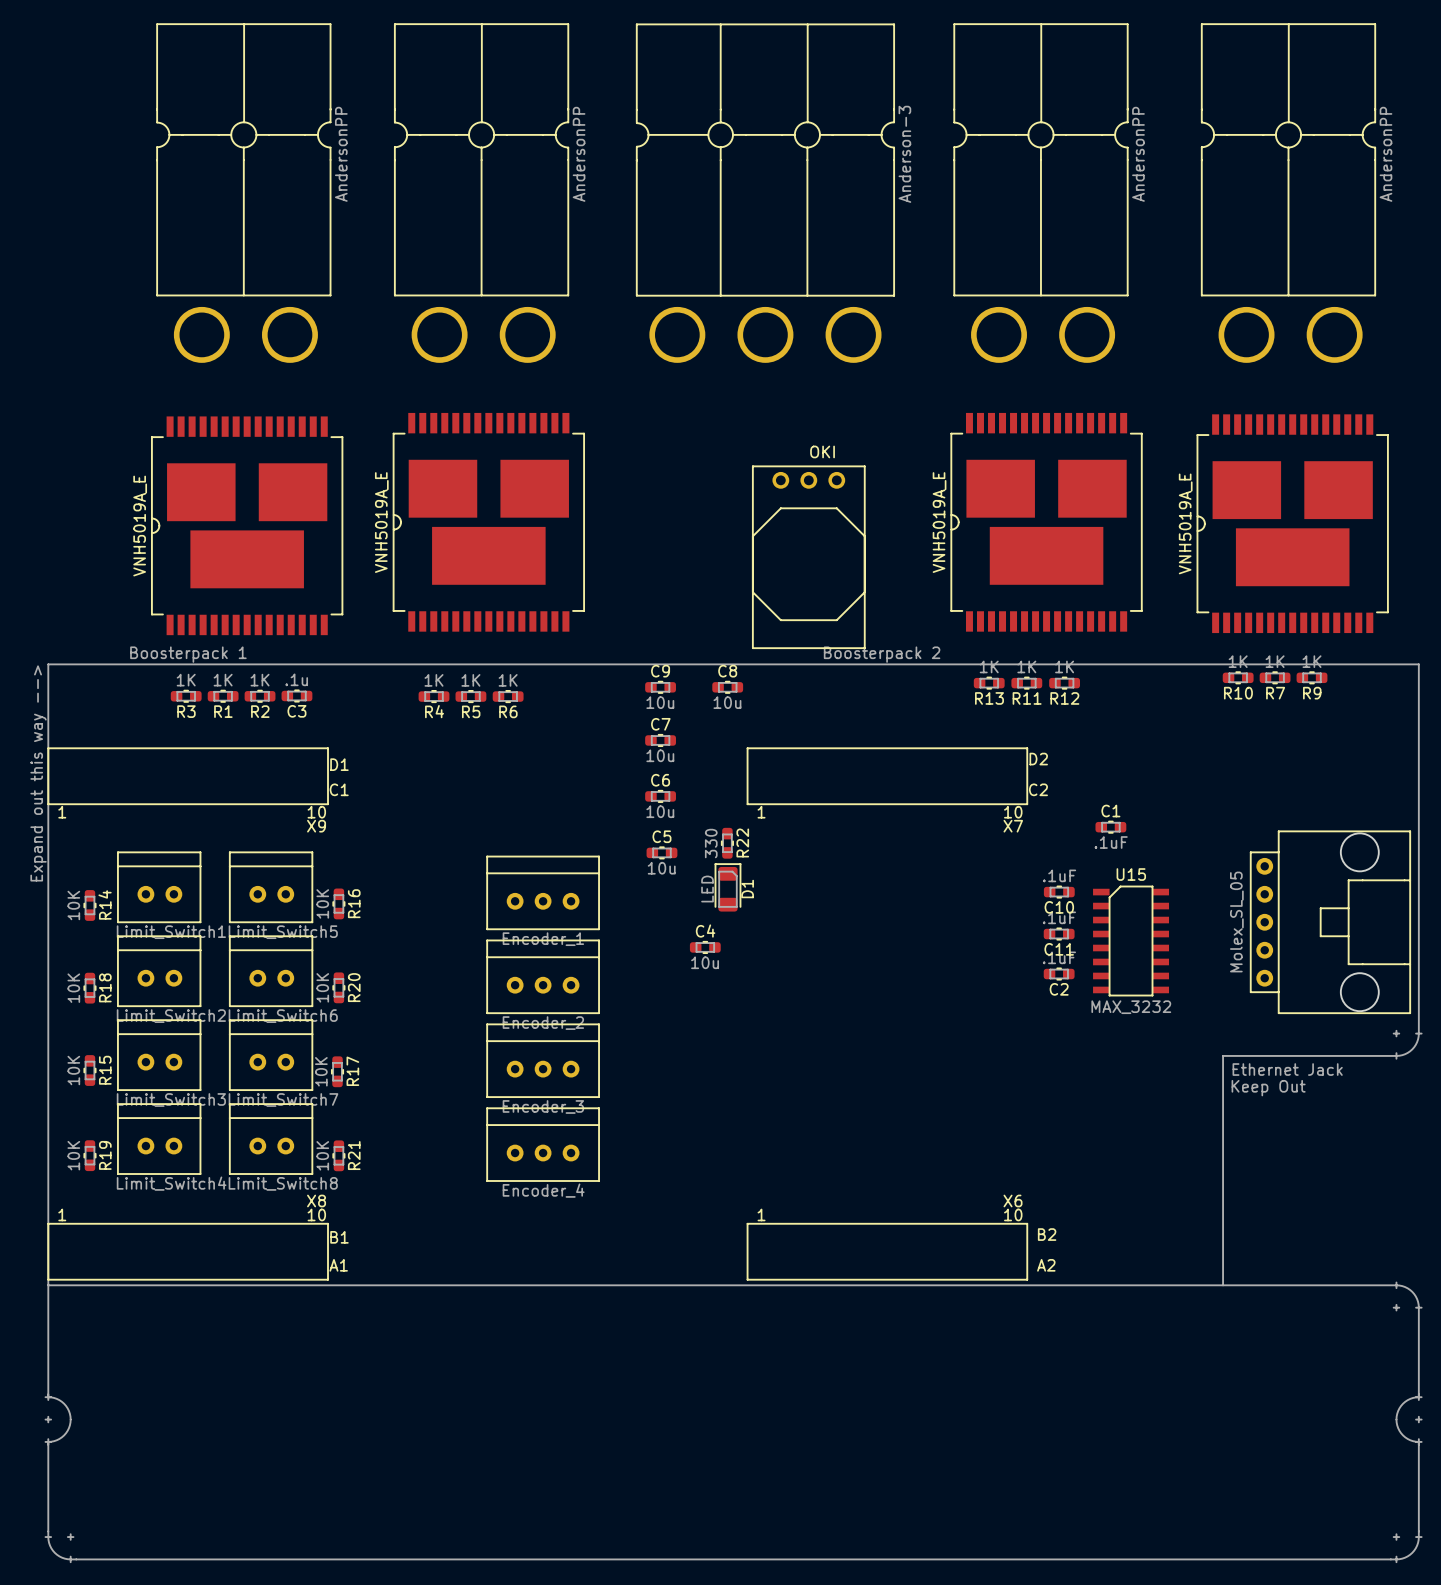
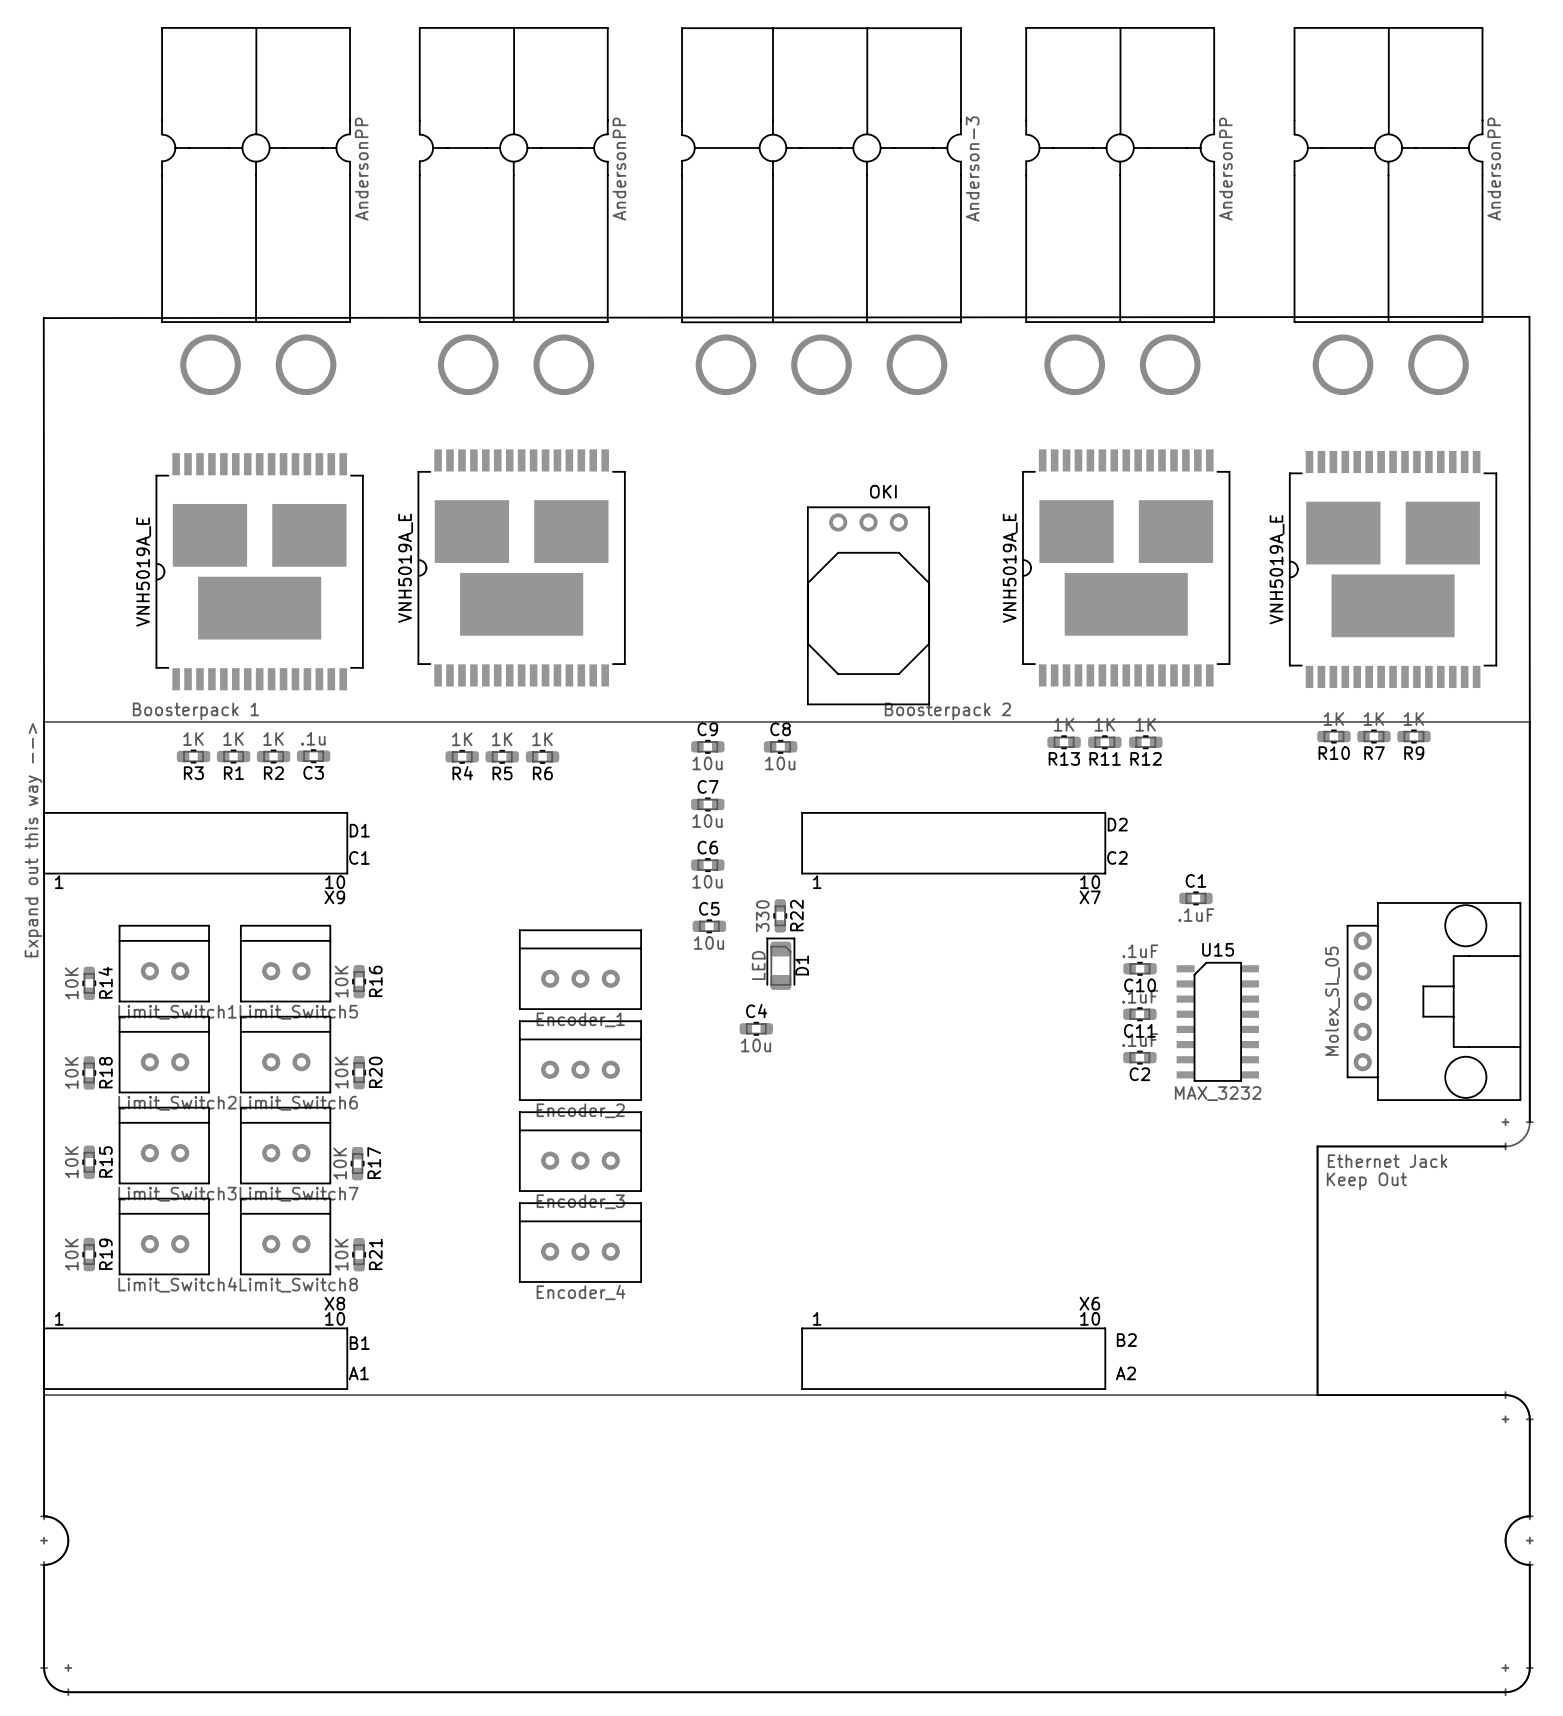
board edge: none -> (43, 318) (44, 1516) (53, 1518) (61, 1523) (66, 1531) (68, 1540) (66, 1549) (61, 1557) (53, 1563) (44, 1564) (44, 1671) (49, 1682) (56, 1688) (68, 1692) (1505, 1692) (1514, 1690) (1524, 1682) (1529, 1671) (1529, 1564) (1520, 1563) (1512, 1557) (1507, 1549) (1505, 1540) (1507, 1531) (1512, 1523) (1520, 1518) (1529, 1516) (1529, 1419) (1526, 1407) (1517, 1398) (1505, 1395) (1317, 1395) (1317, 1146) (1505, 1146)
board edge: none -> (44, 318) (1529, 316) (1529, 722)
board edge: none -> (1529, 721) (1529, 1122)

